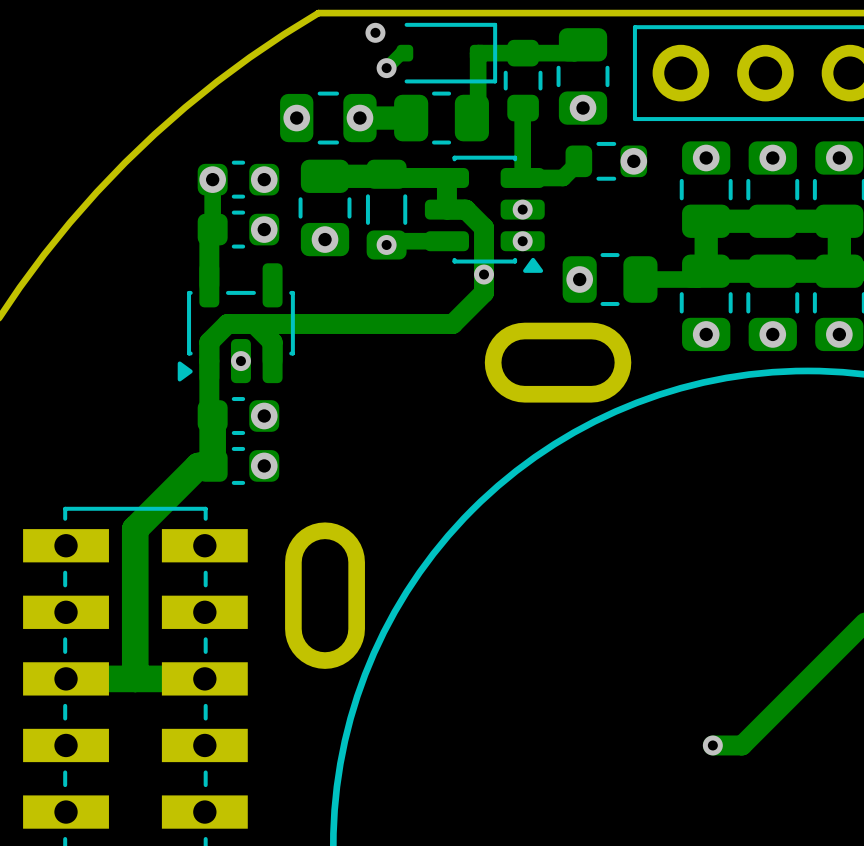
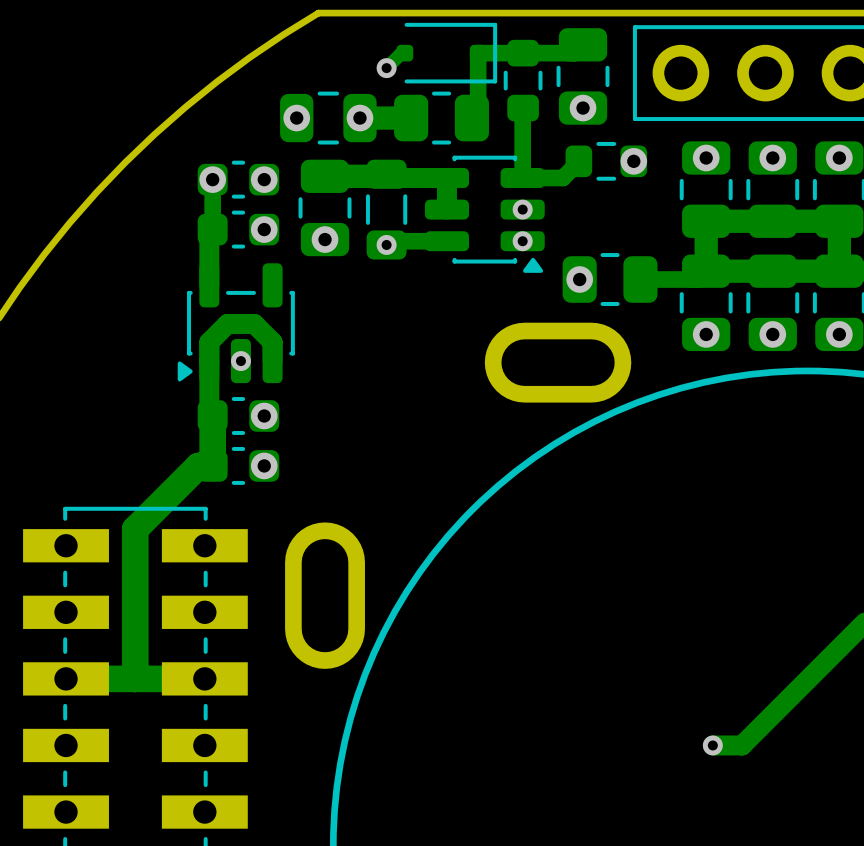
via: (375, 32) -> none
track: (446, 209) (465, 209) (484, 227) (484, 292) (452, 324) (254, 324) -> none
via: (484, 274) -> none

